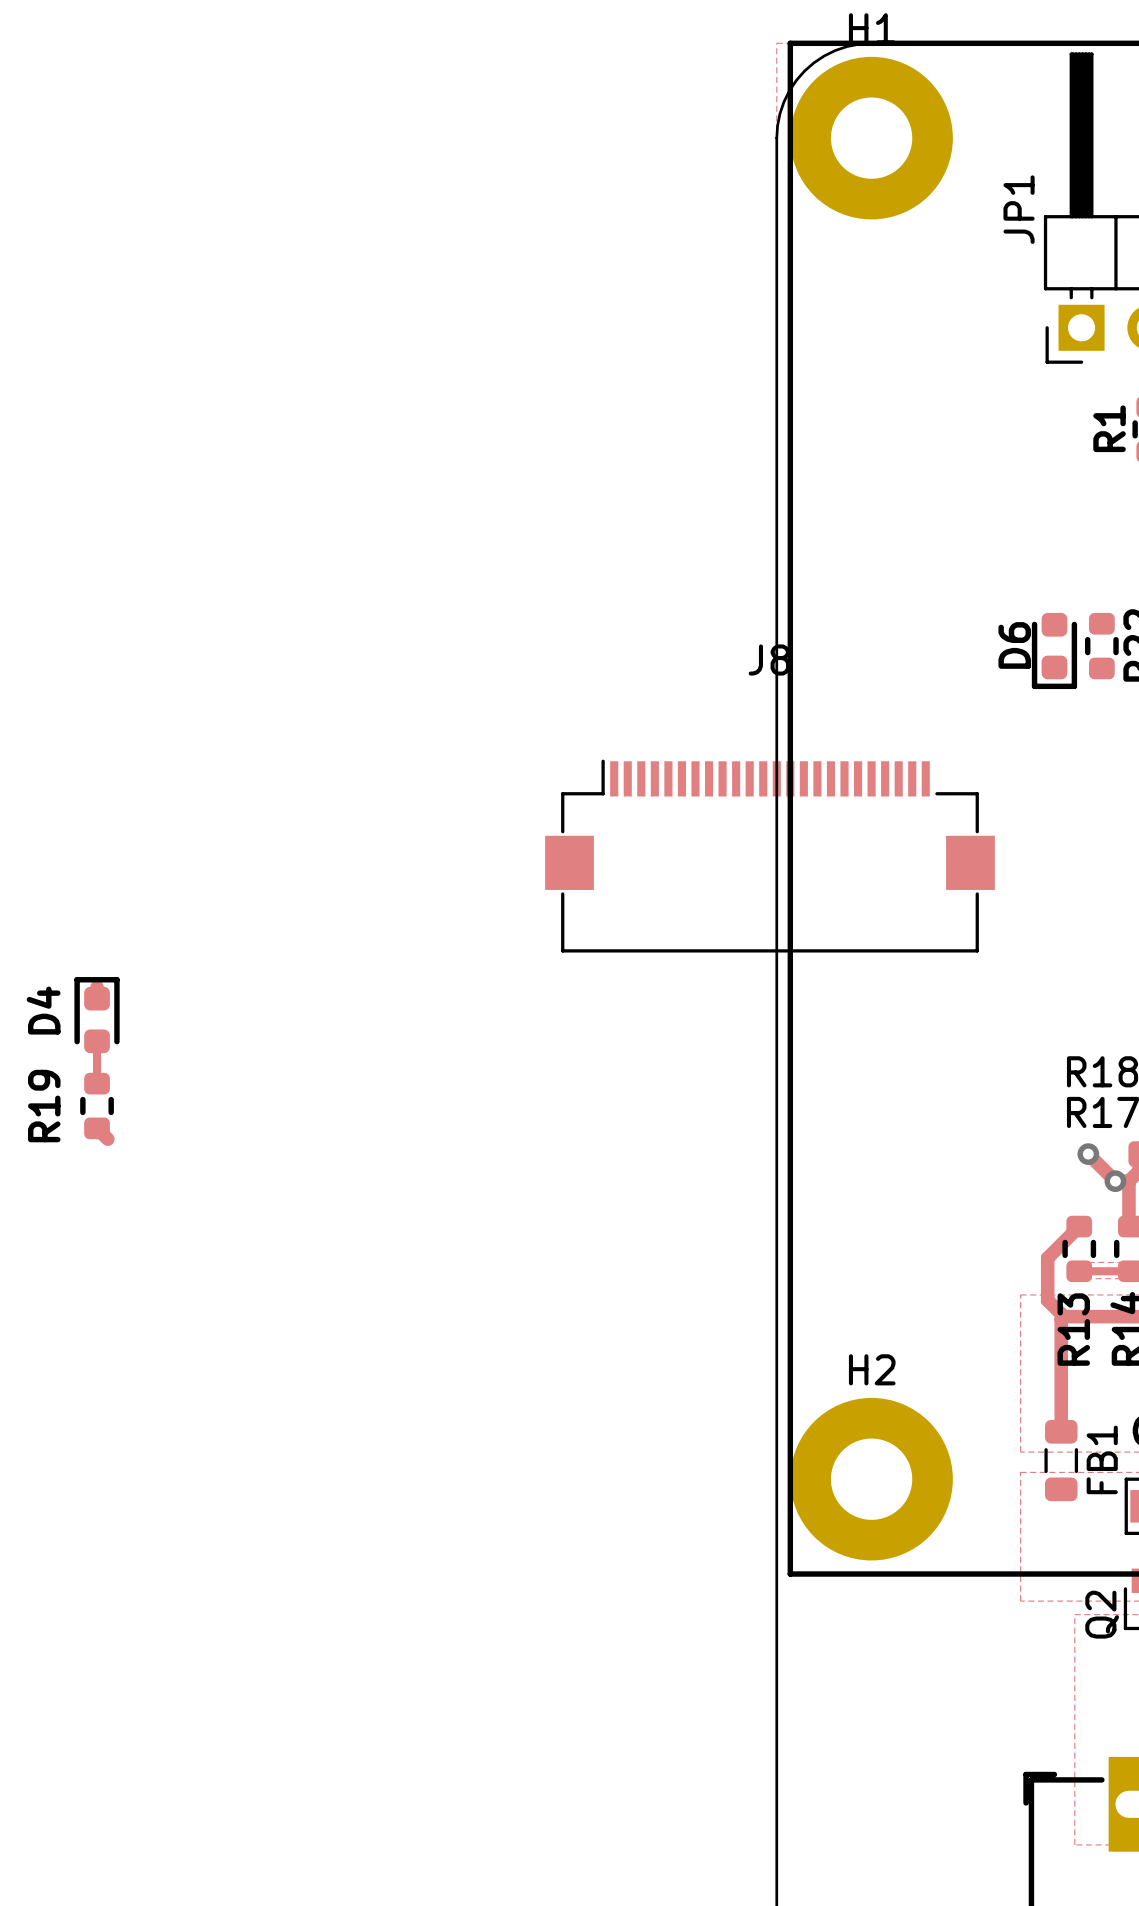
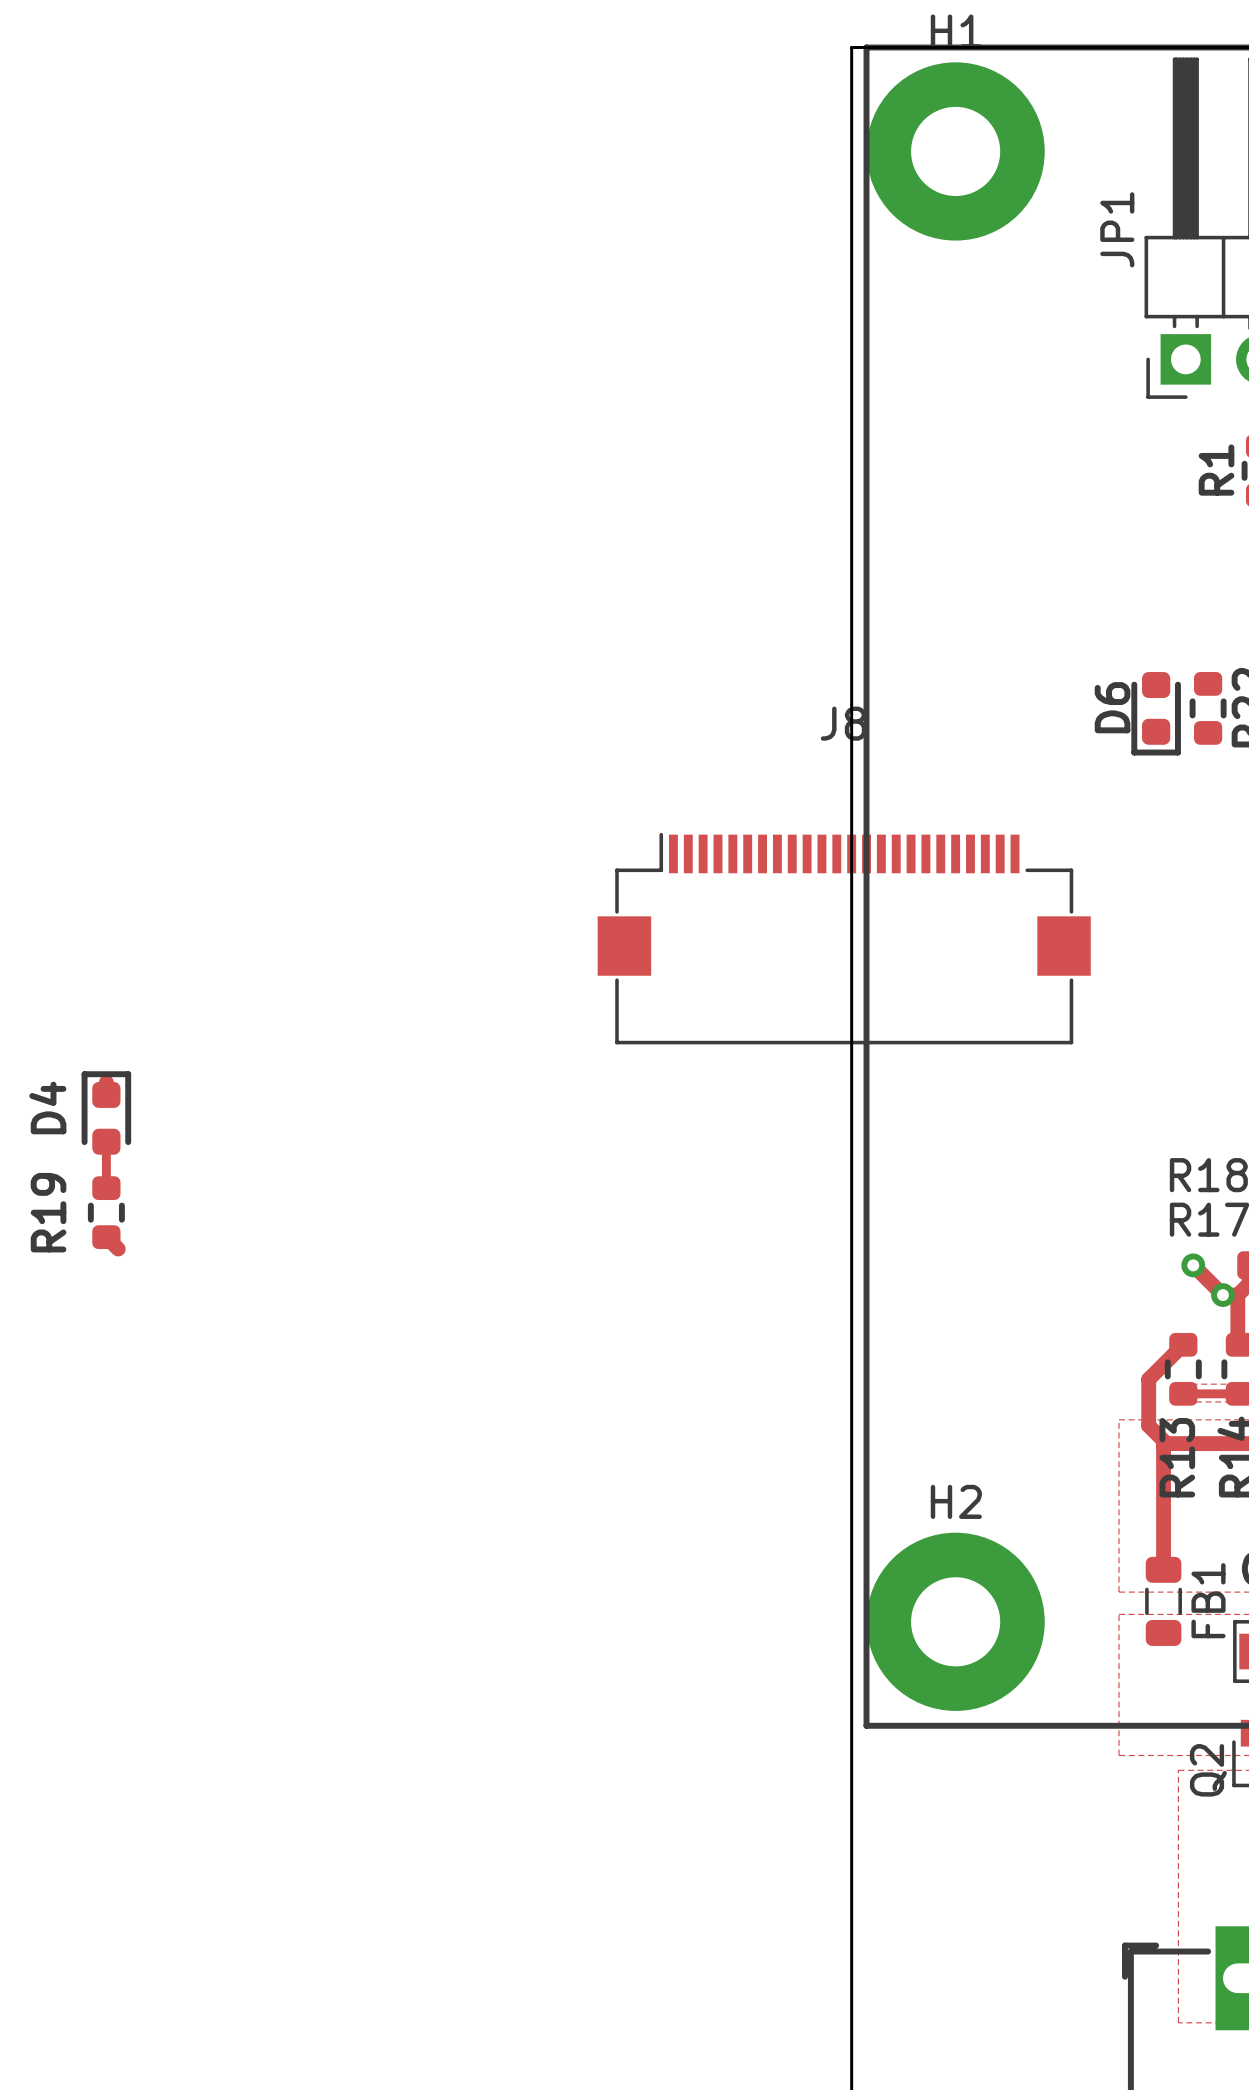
board edge: (871, 43) (847, 46) (835, 50) (824, 56) (804, 71) (796, 80) (783, 101) (780, 113) (776, 138) -> (955, 47) (851, 47) (851, 151)

